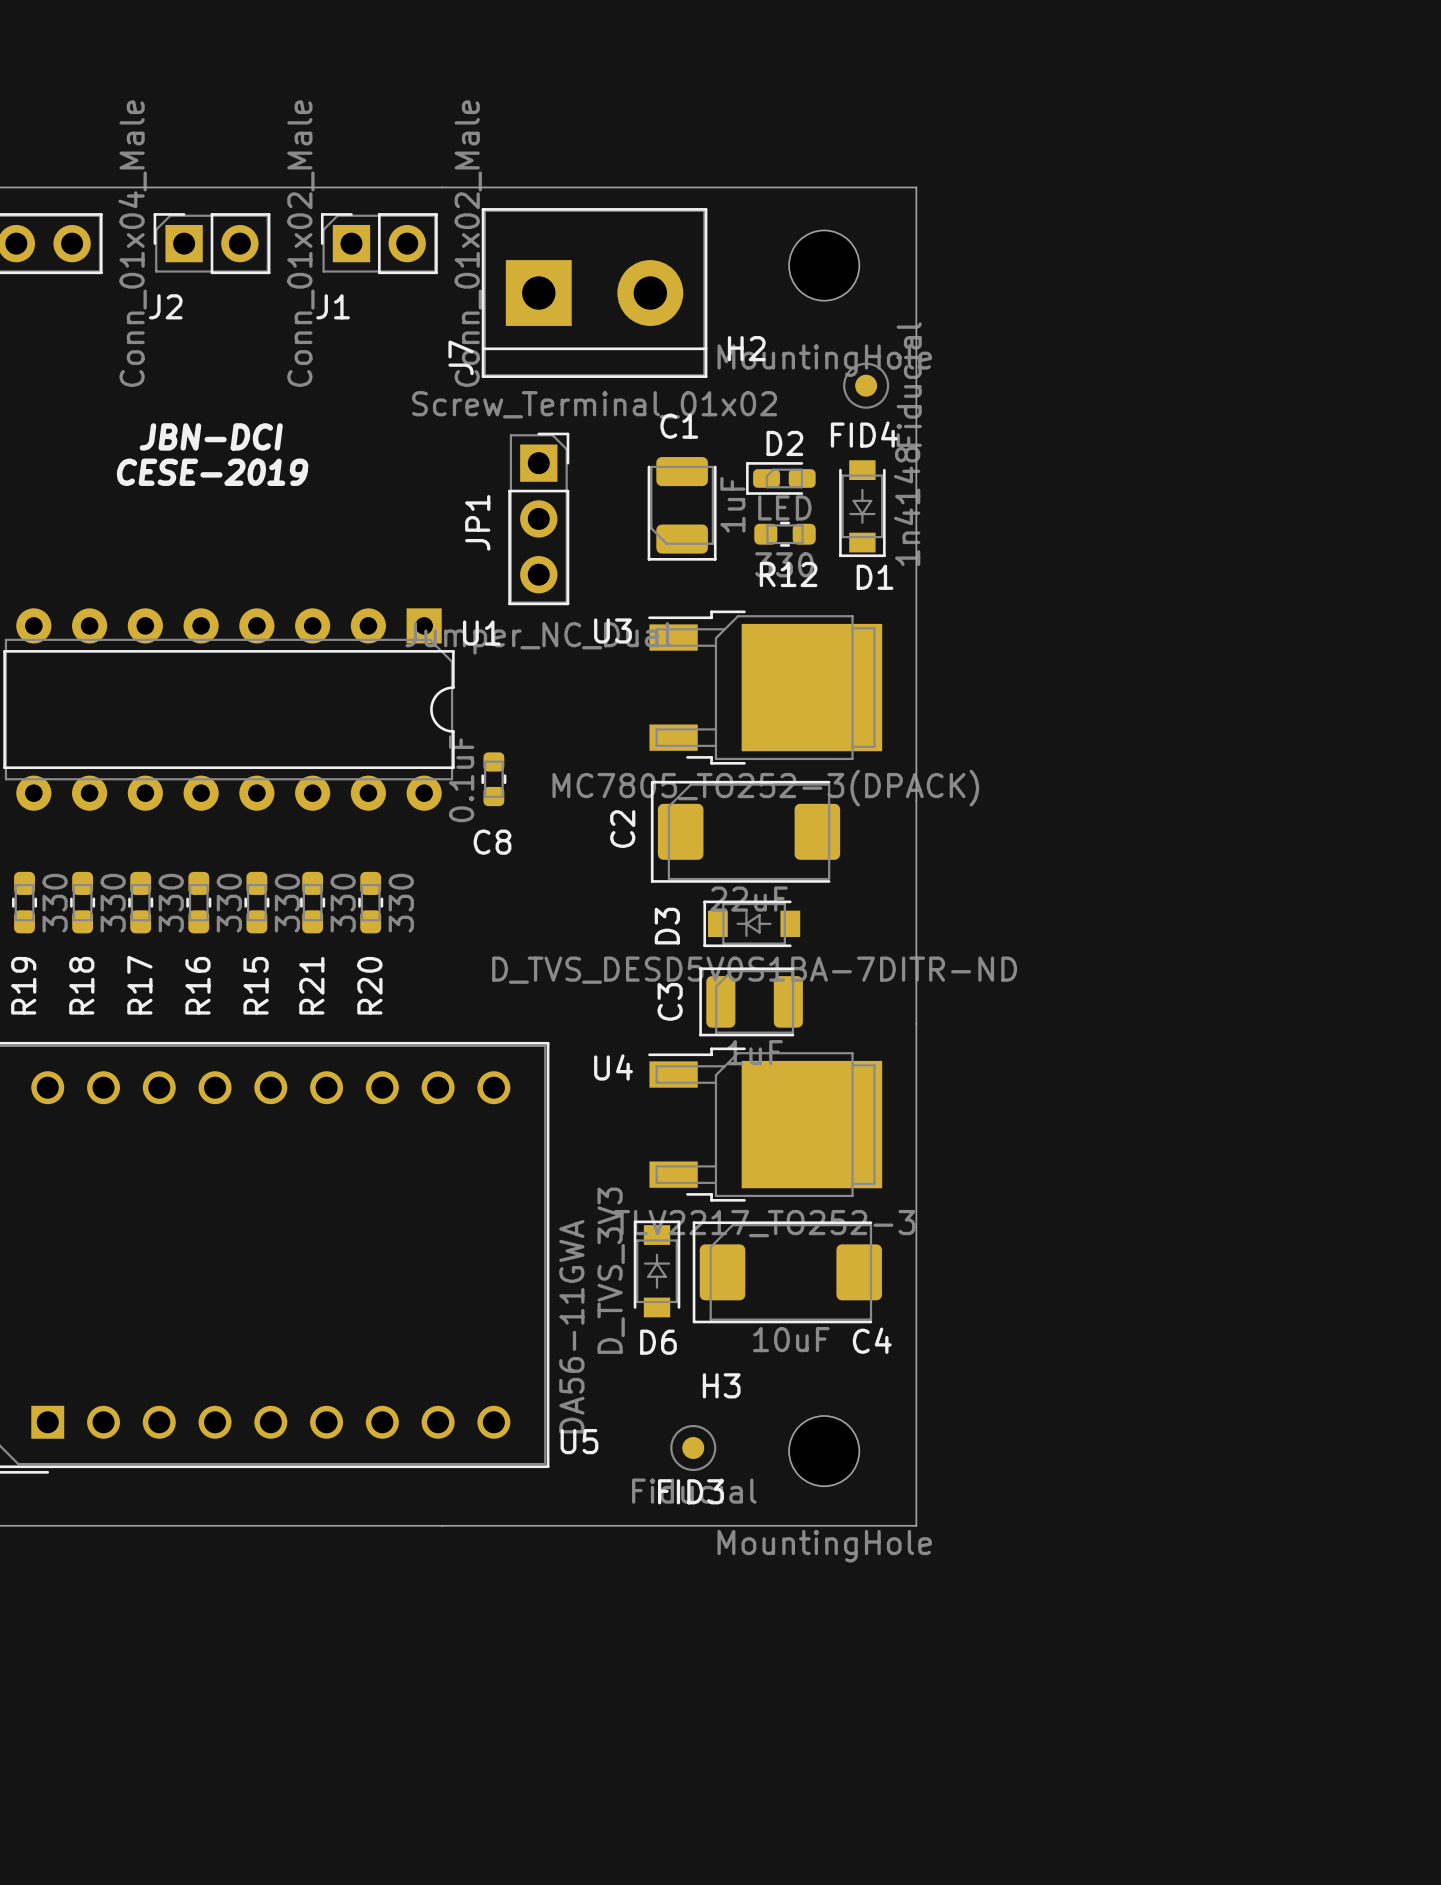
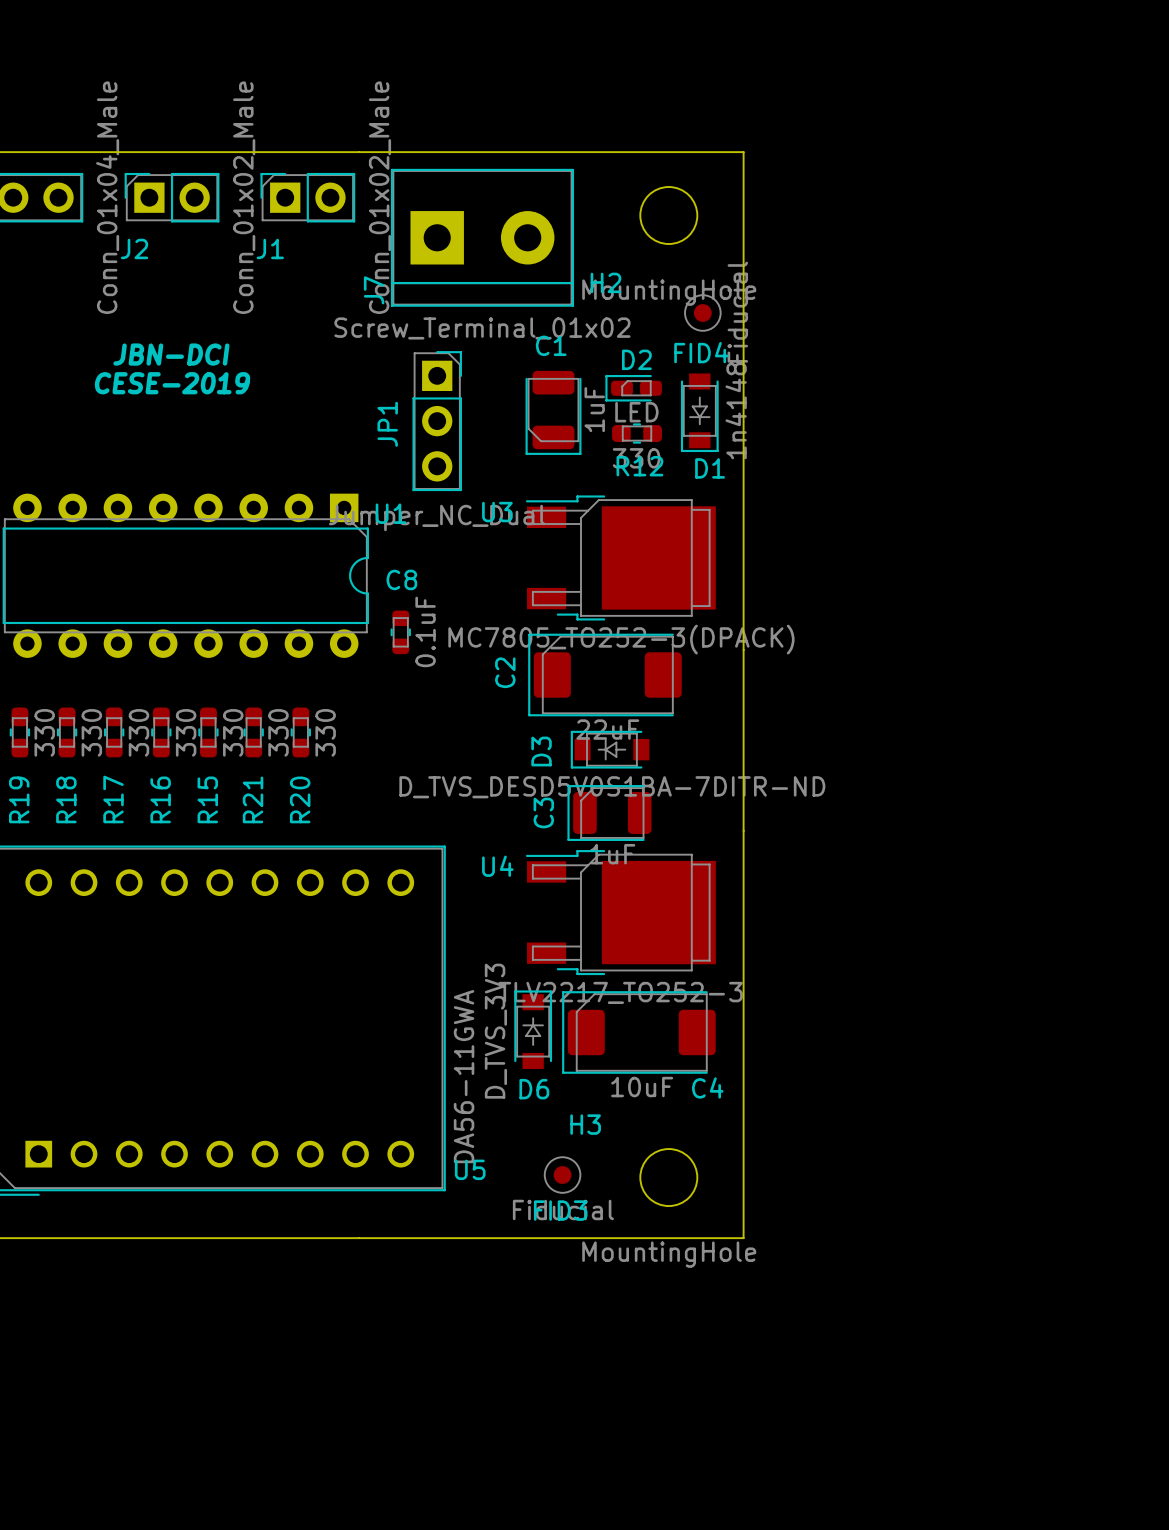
C8 value position: 0.1uF (461, 778) -> 0.1uF (425, 631)
C8 name position: C8 (492, 842) -> C8 (401, 579)

